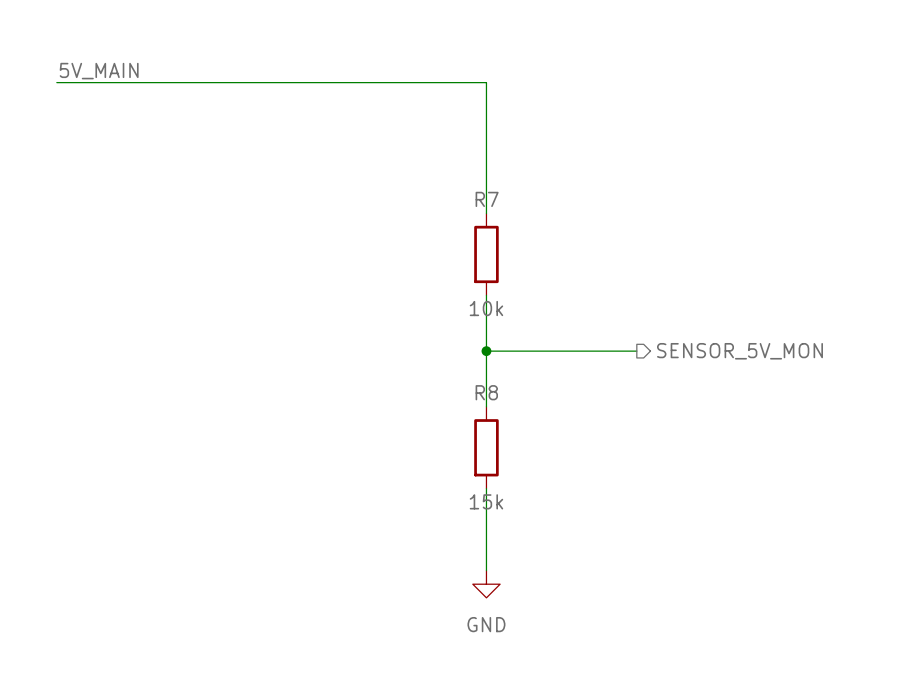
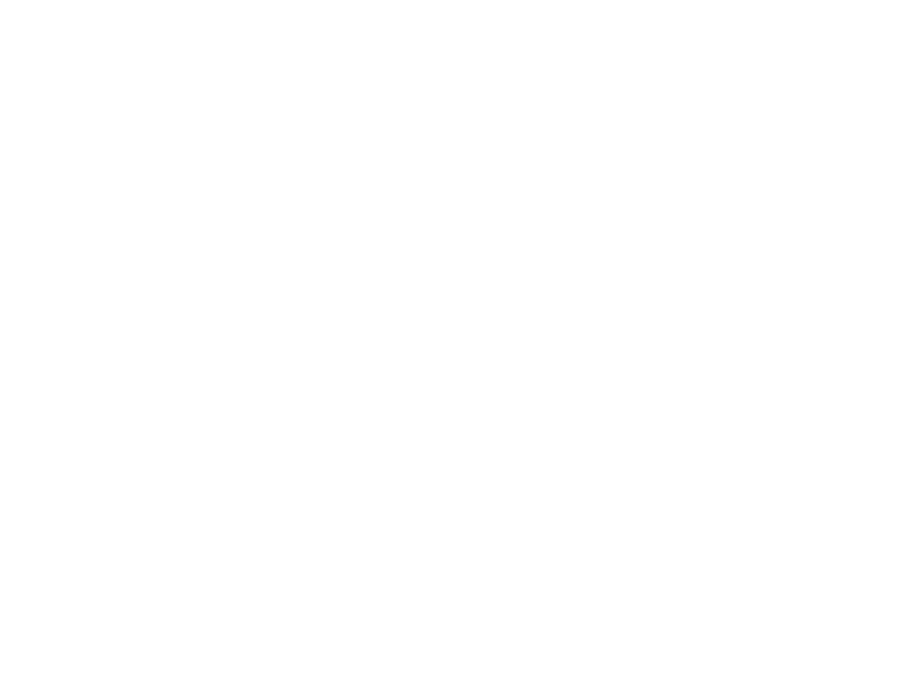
label: 5V_MAIN (99, 71) -> none
wire: (56, 82) (486, 82) (486, 213) -> none
R7: 10k (486, 254) -> none
wire: (486, 295) (486, 406) -> none
wire: (486, 351) (636, 351) -> none
junction: (486, 351) -> none
hierarchical label: SENSOR_5V_MON (739, 351) -> none
R8: 15k (486, 447) -> none
wire: (486, 488) (486, 570) -> none
power symbol: GND (486, 584) -> none

